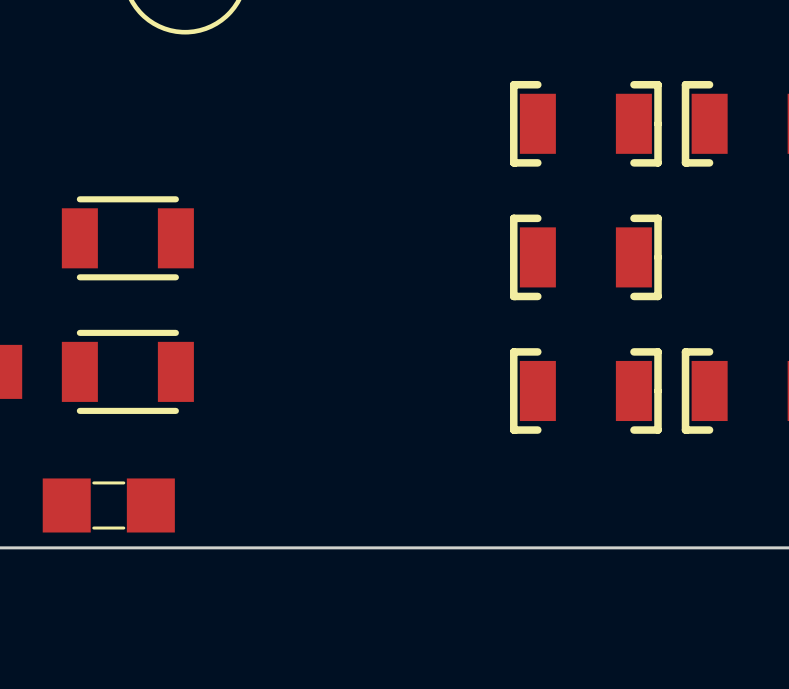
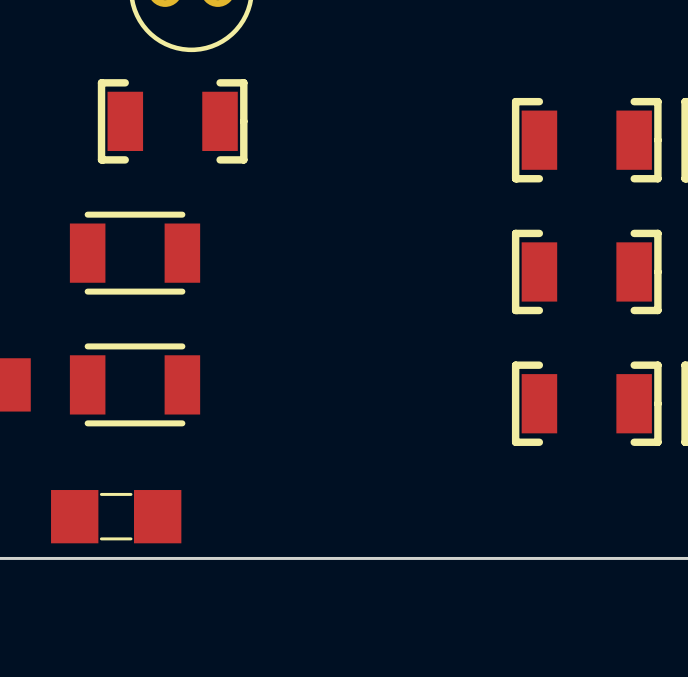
part: none -> (172, 121)

